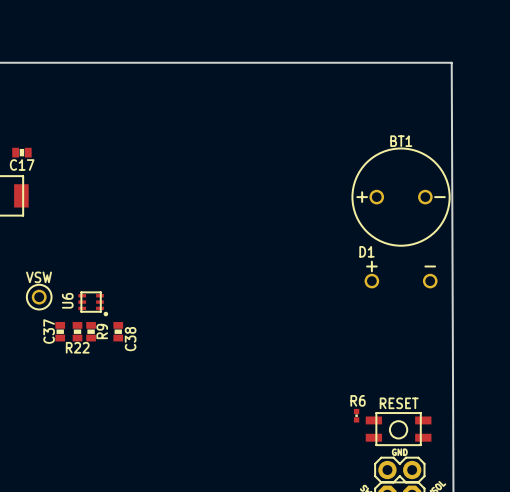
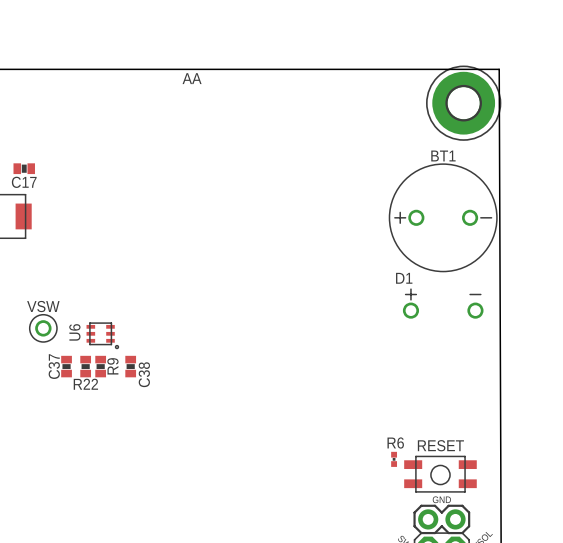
text: none -> AA (192, 78)
part: none -> (463, 103)

